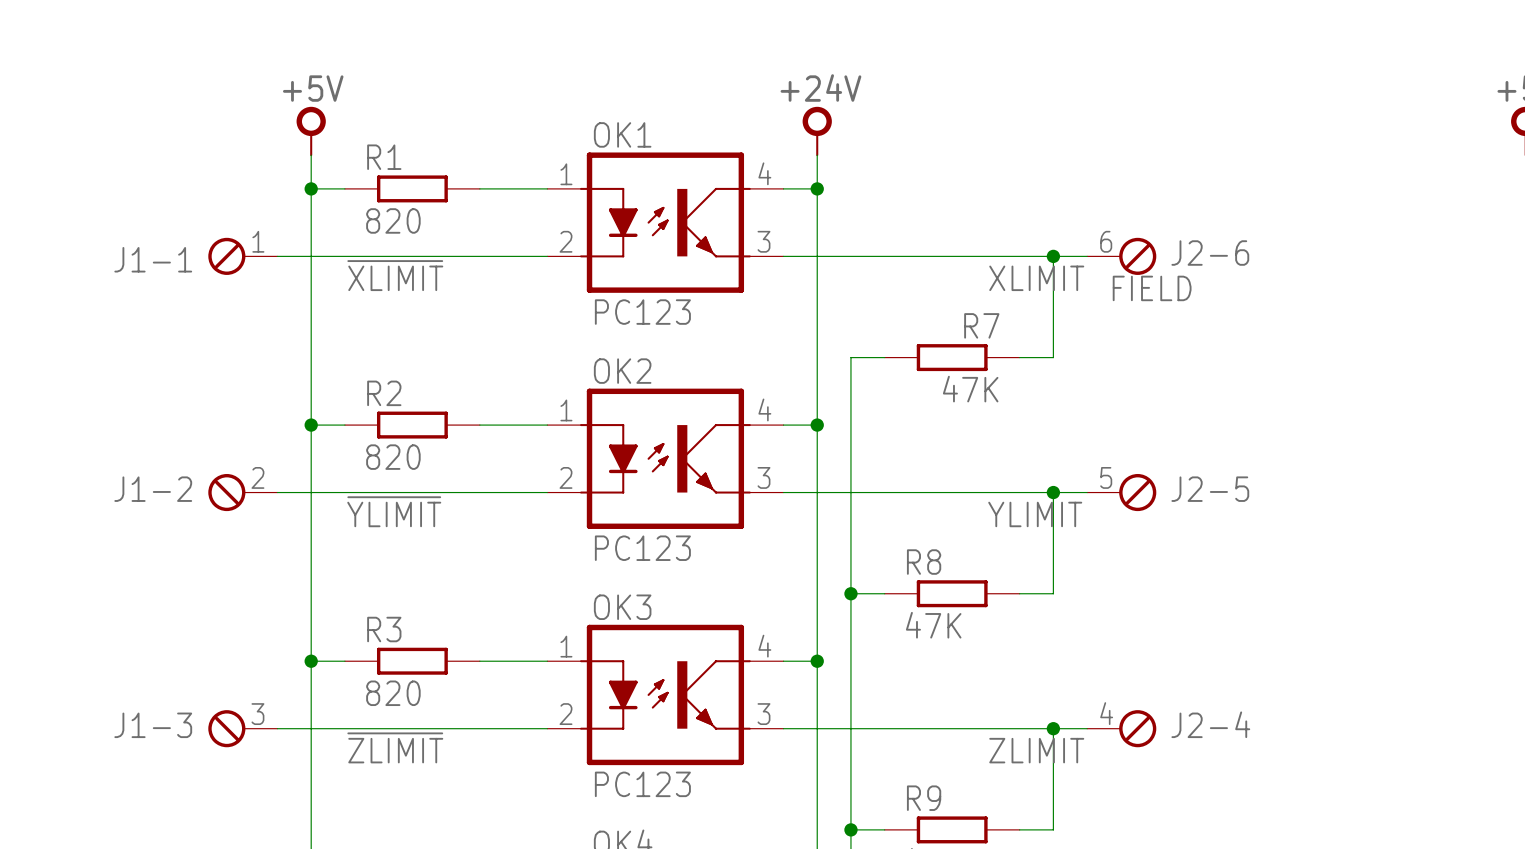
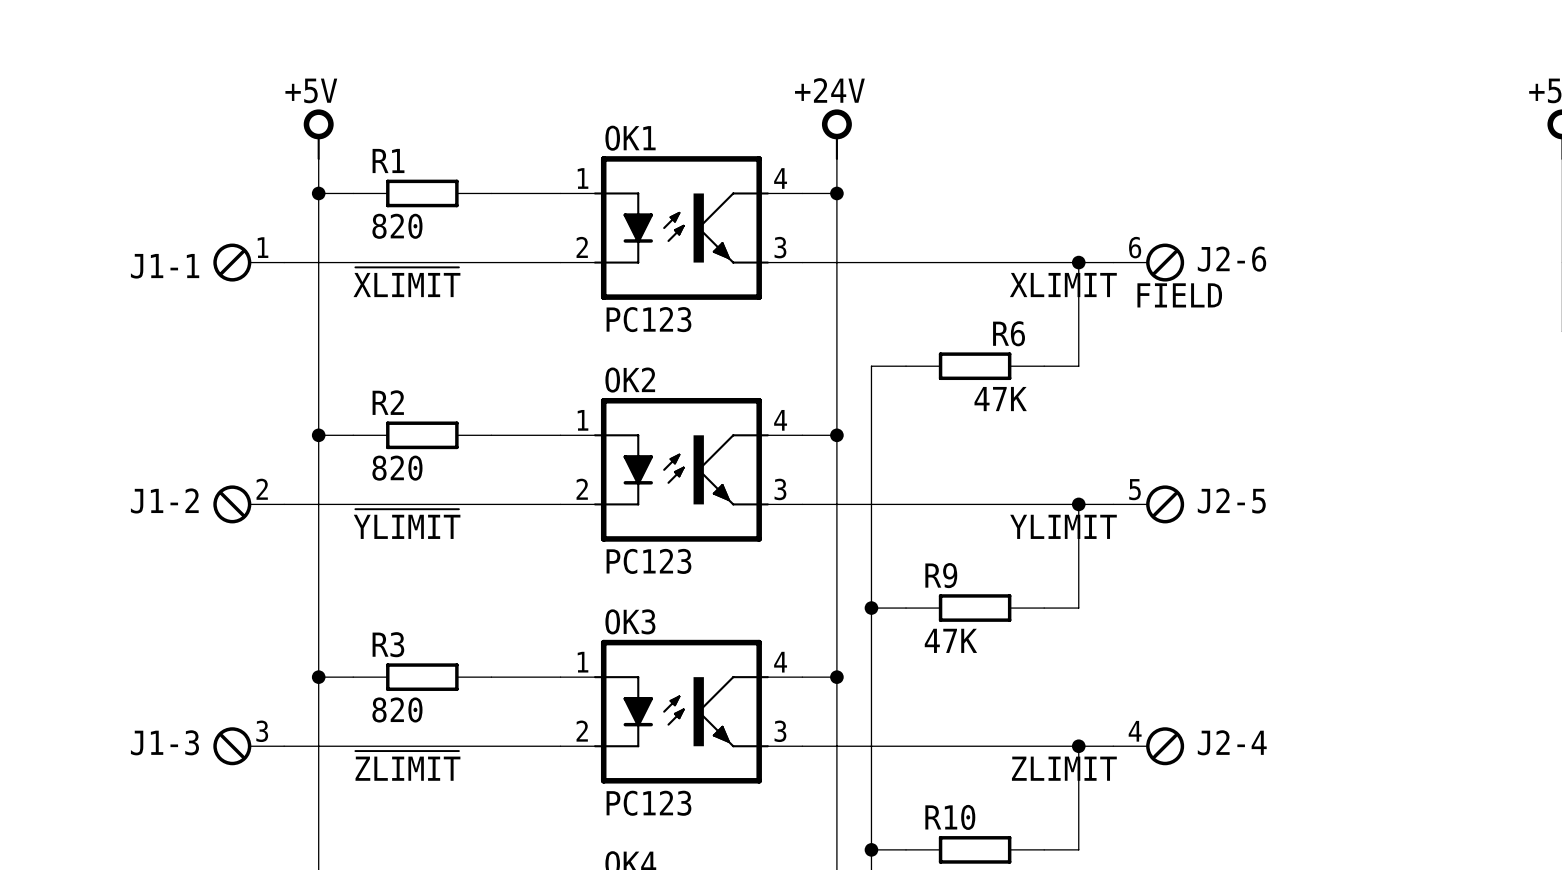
R7 name: R7 (981, 325) -> R6 (1009, 333)
R8 name: R8 (924, 562) -> R9 (941, 575)
R9 name: R9 (924, 798) -> R10 (950, 817)

